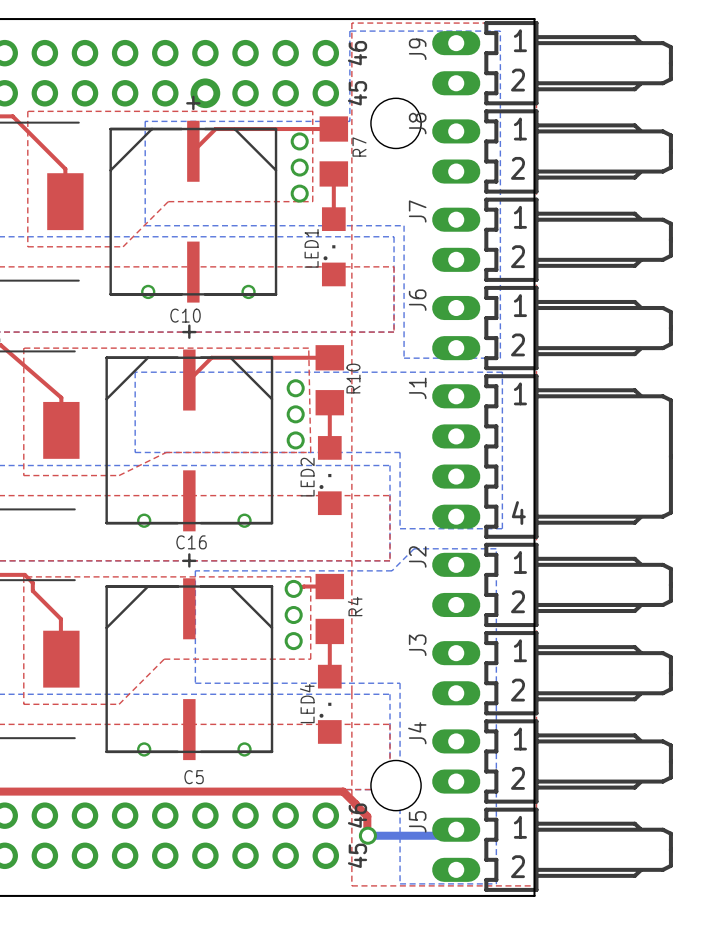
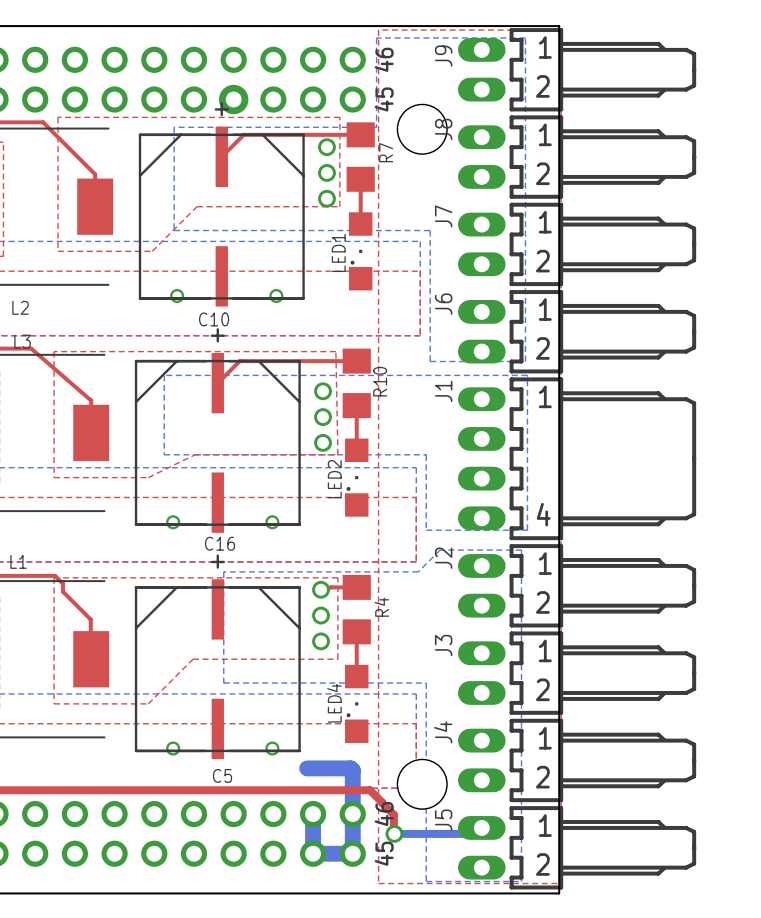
bottom track: none -> (307, 768) (350, 768) (352, 770) (352, 853) (313, 853) (313, 814)

